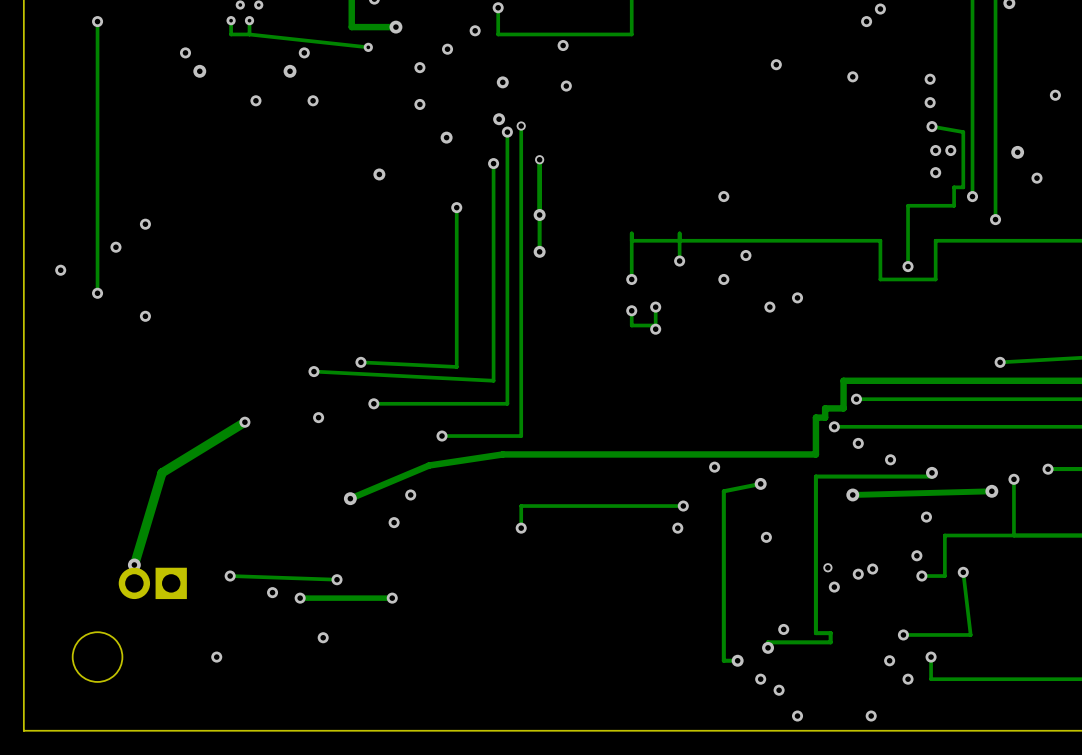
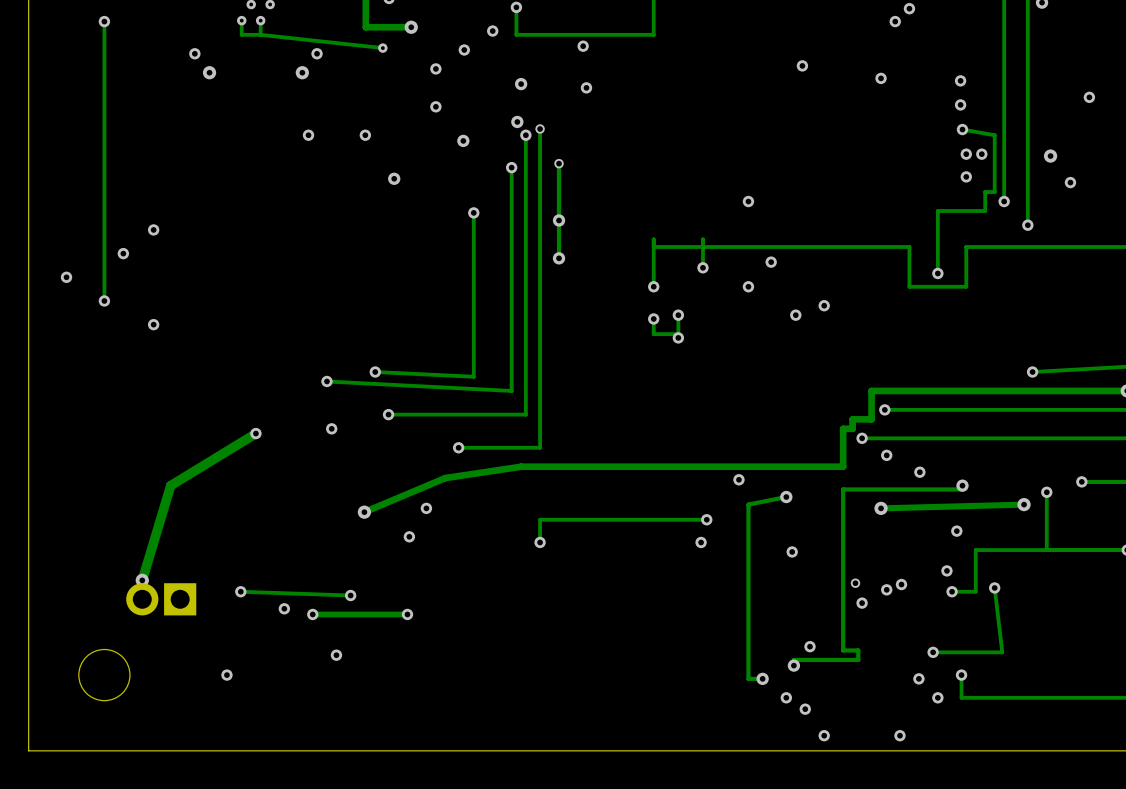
via: (255, 100) -> none
via: (313, 100) -> none
via: none -> (308, 135)
via: none -> (365, 135)

